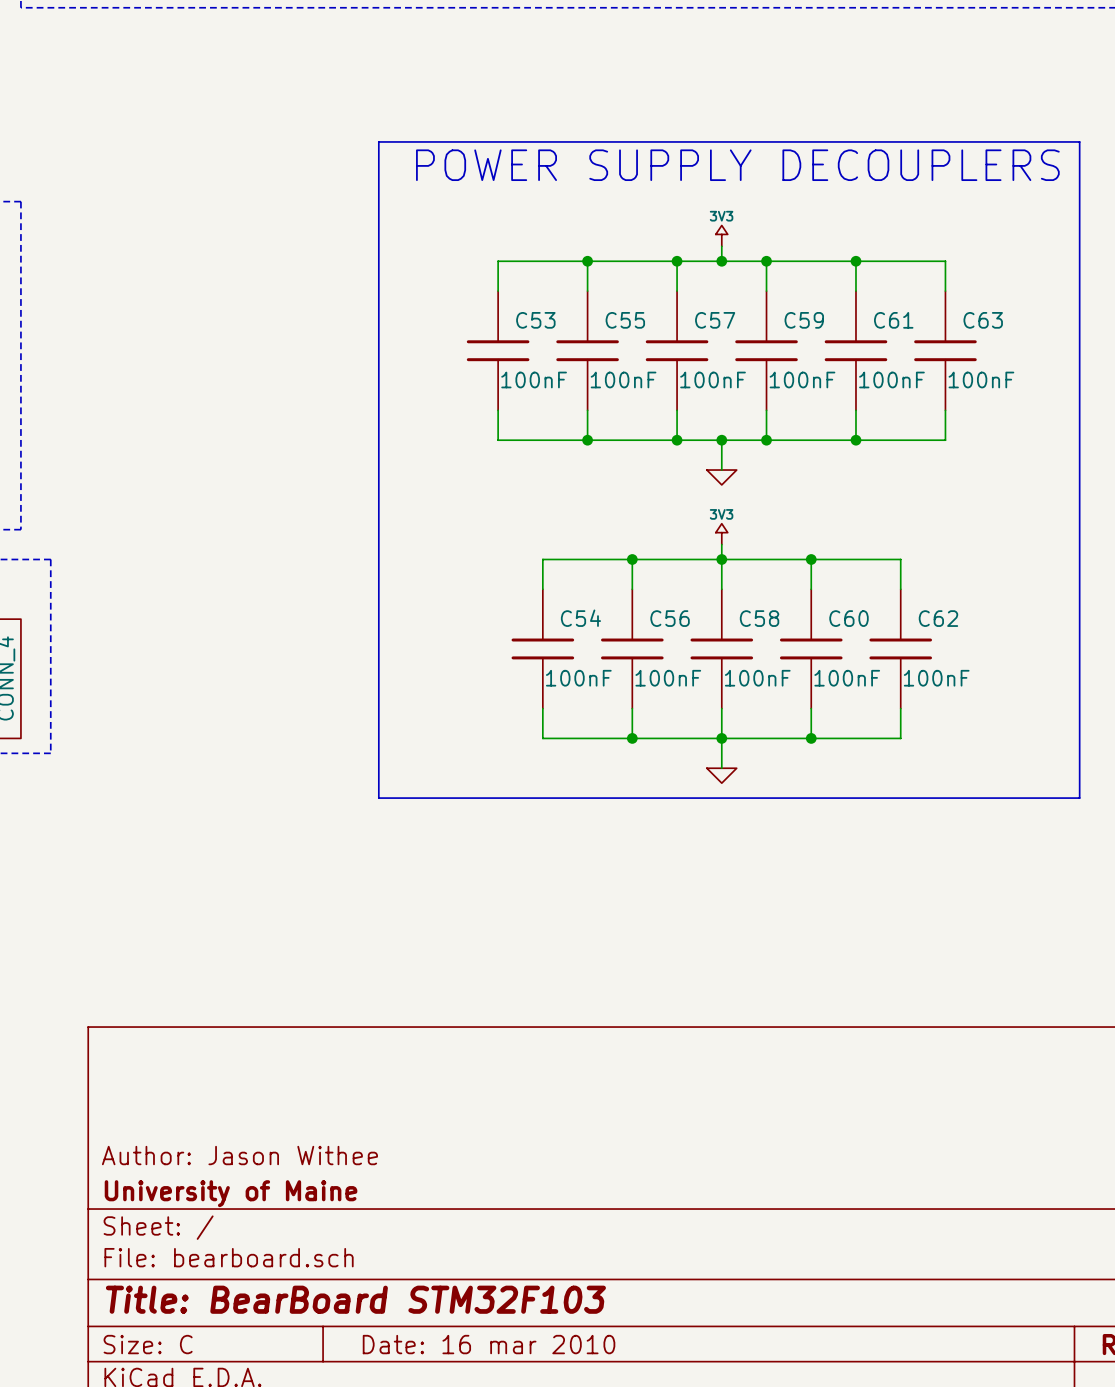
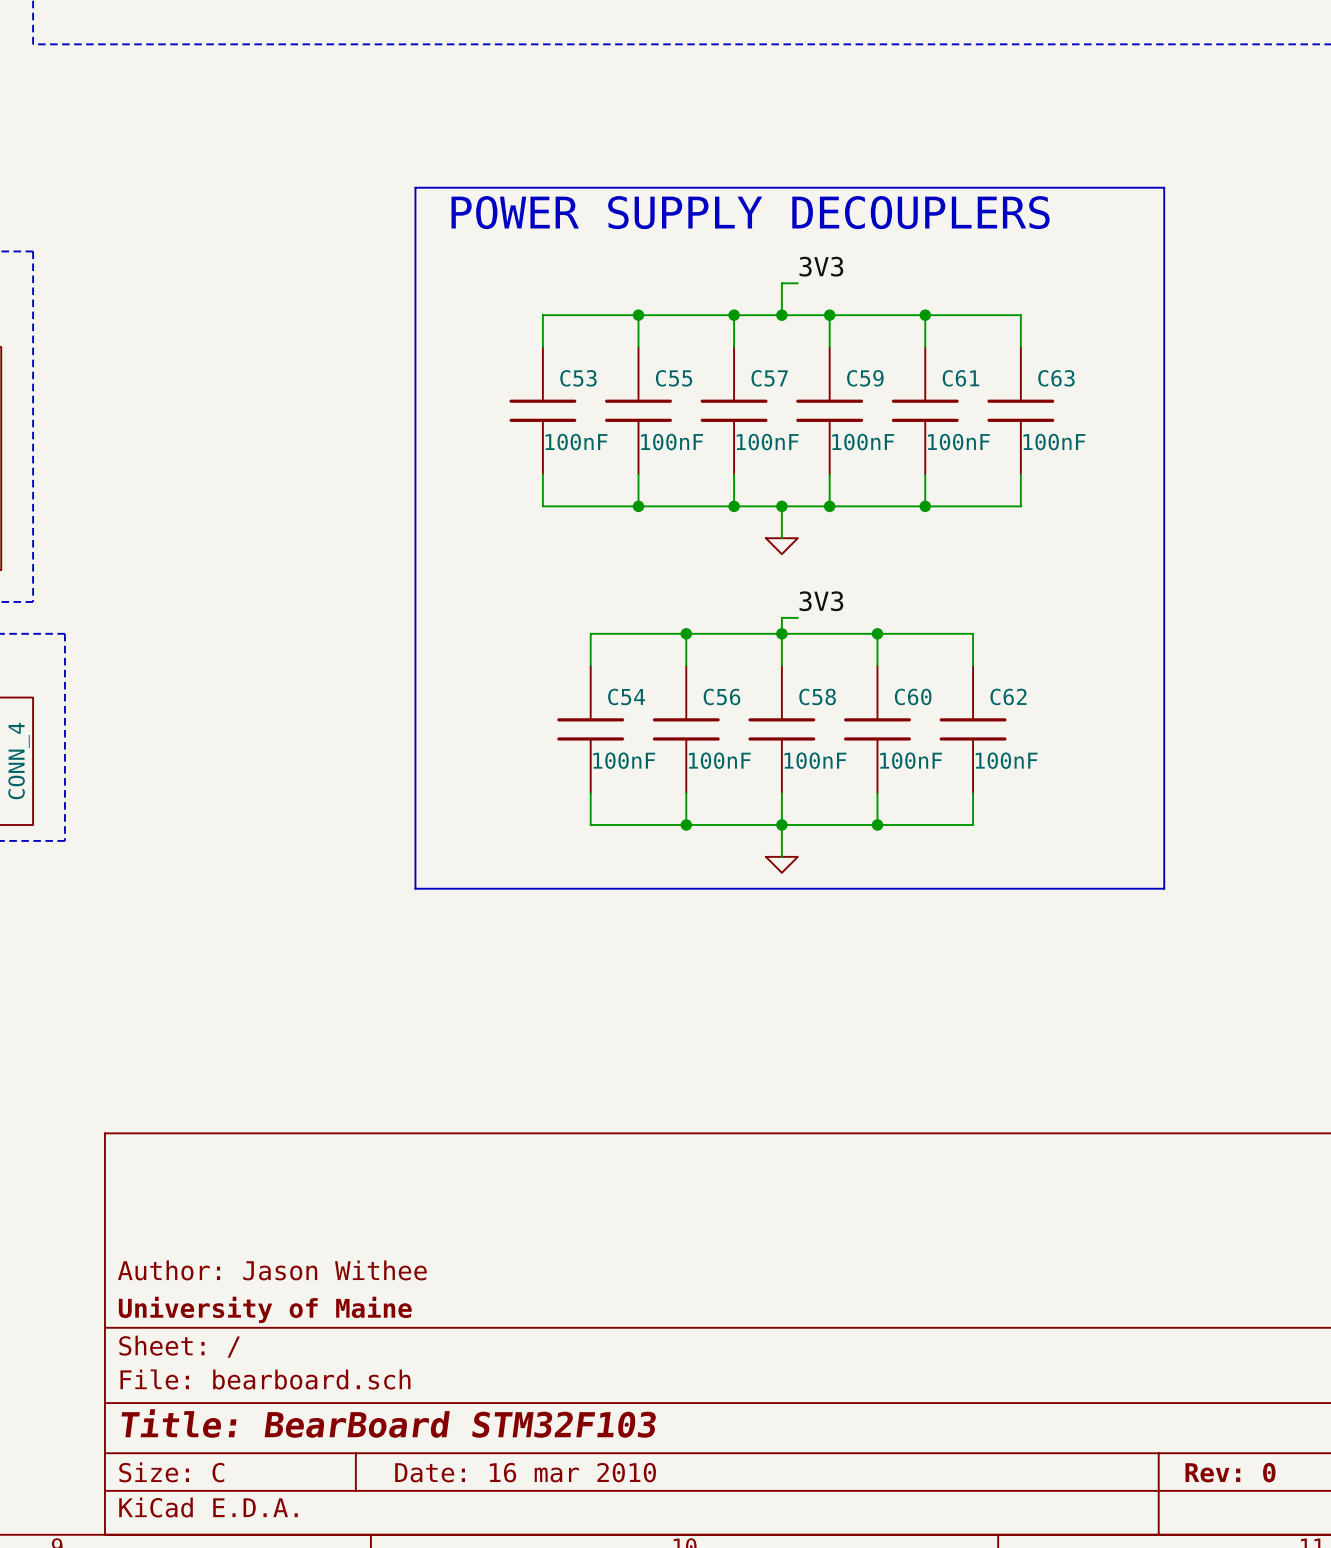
label: none -> 3V3 (821, 266)
wire: none -> (797, 283) (781, 283) (781, 299)
power symbol: 3V3 (721, 235) -> none
label: none -> 3V3 (821, 601)
power symbol: 3V3 (721, 534) -> none
wire: none -> (781, 617) (797, 617)

